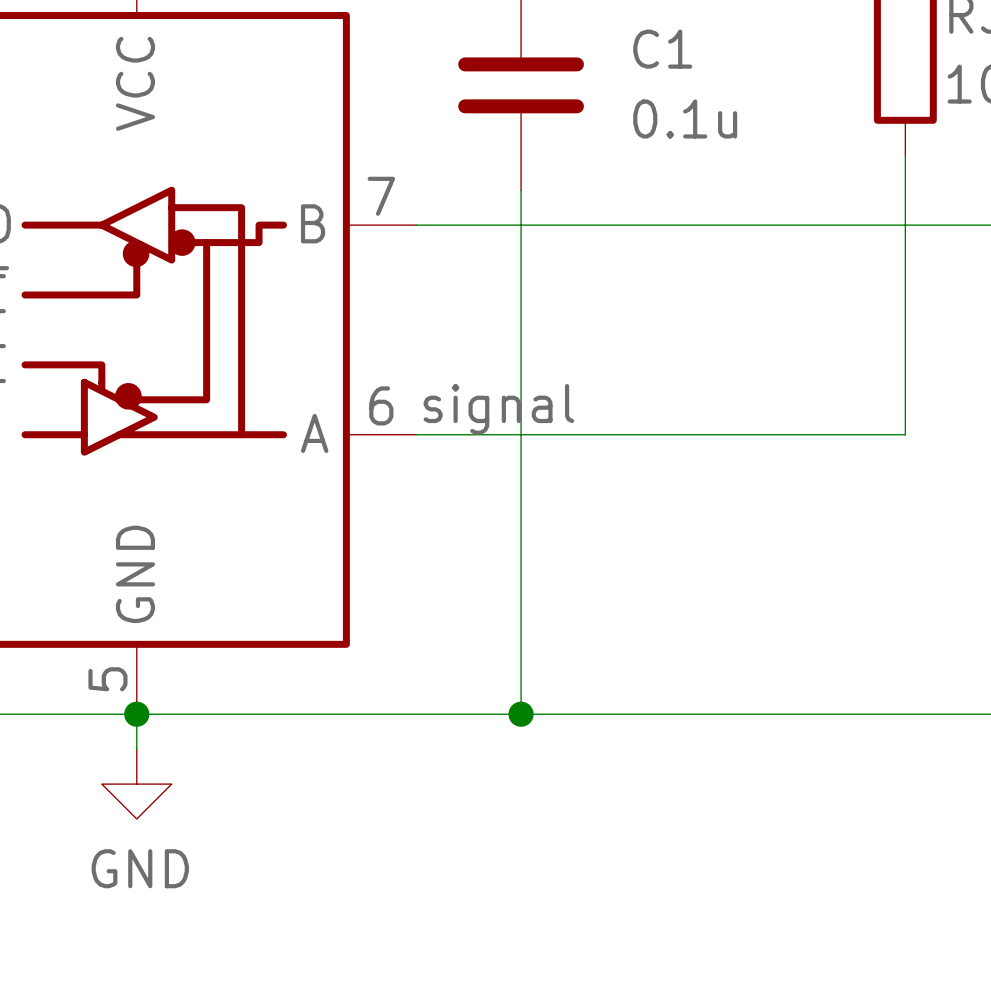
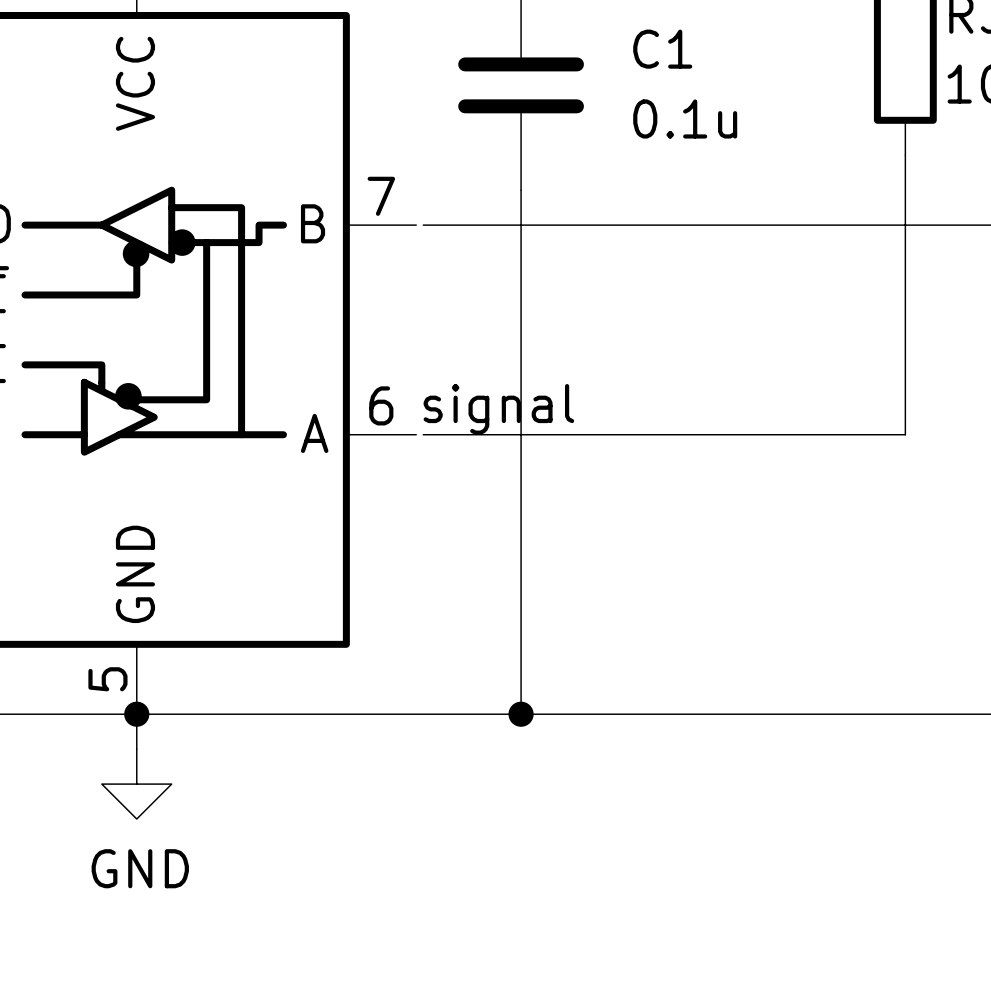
wire: (416, 225) (423, 225) -> none
wire: (416, 434) (423, 434) -> none

